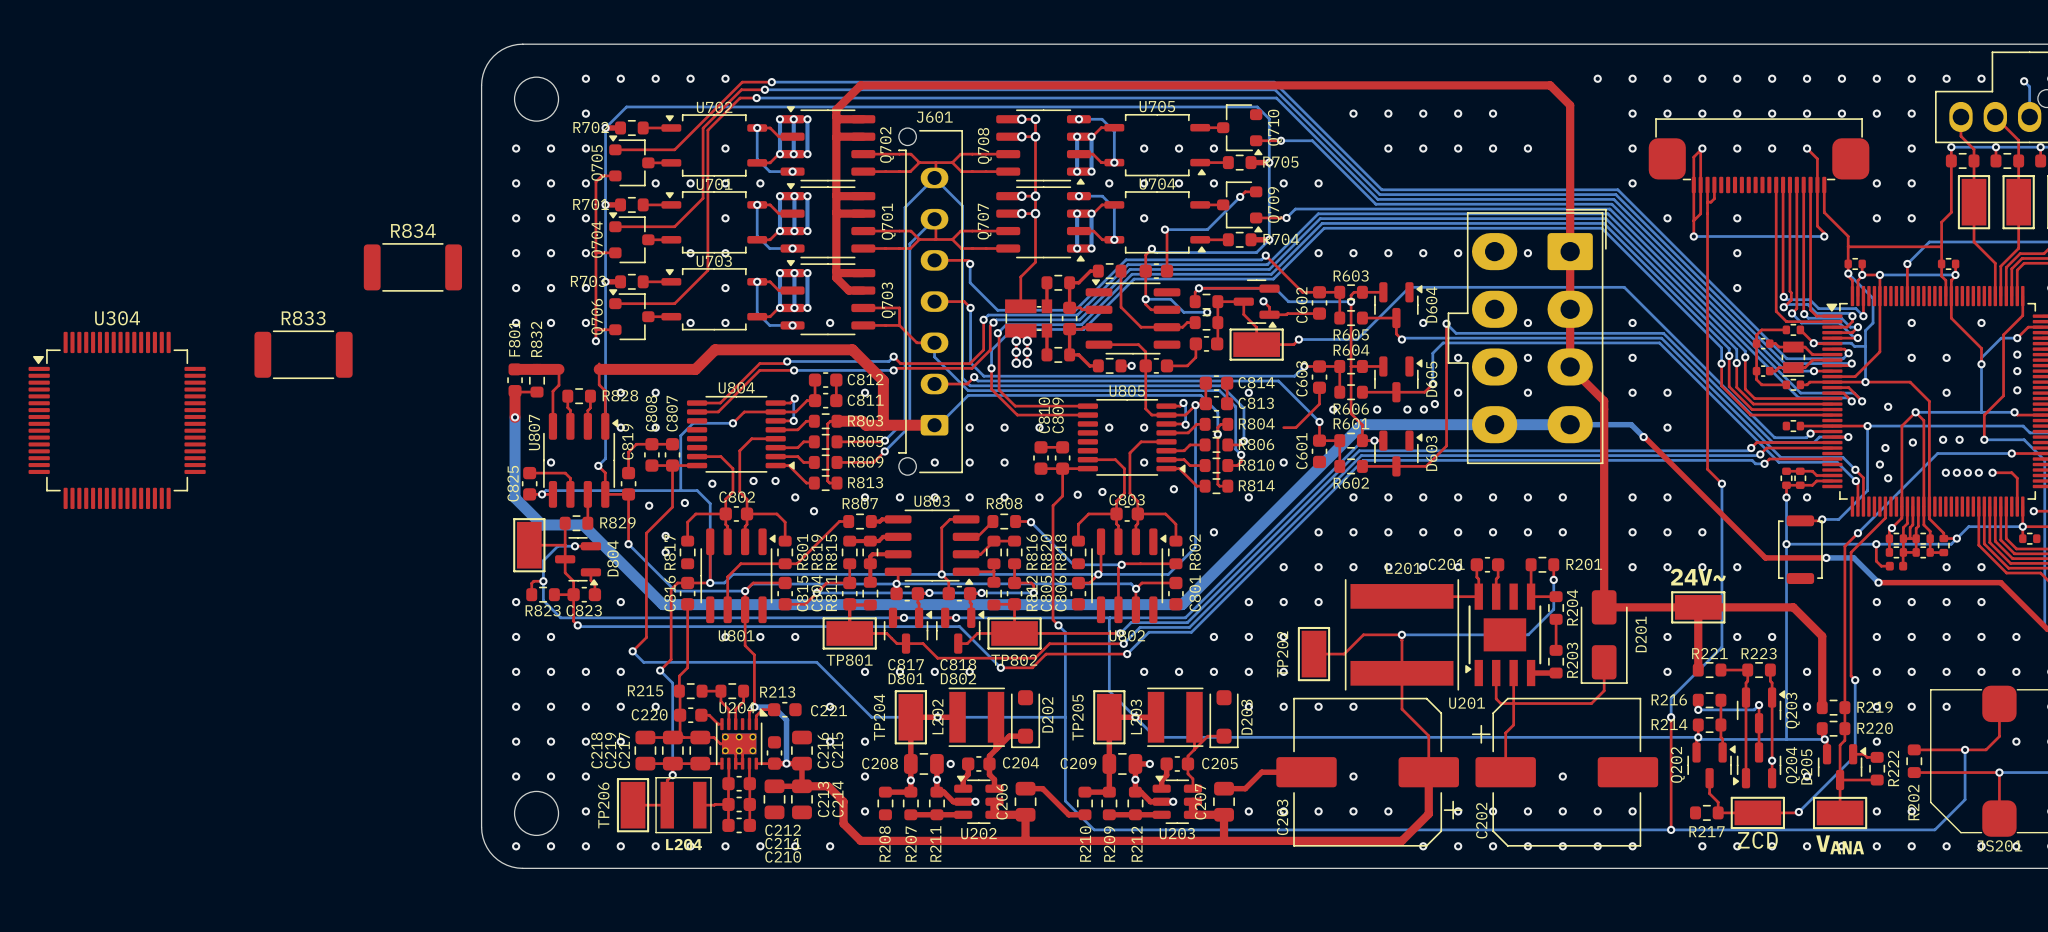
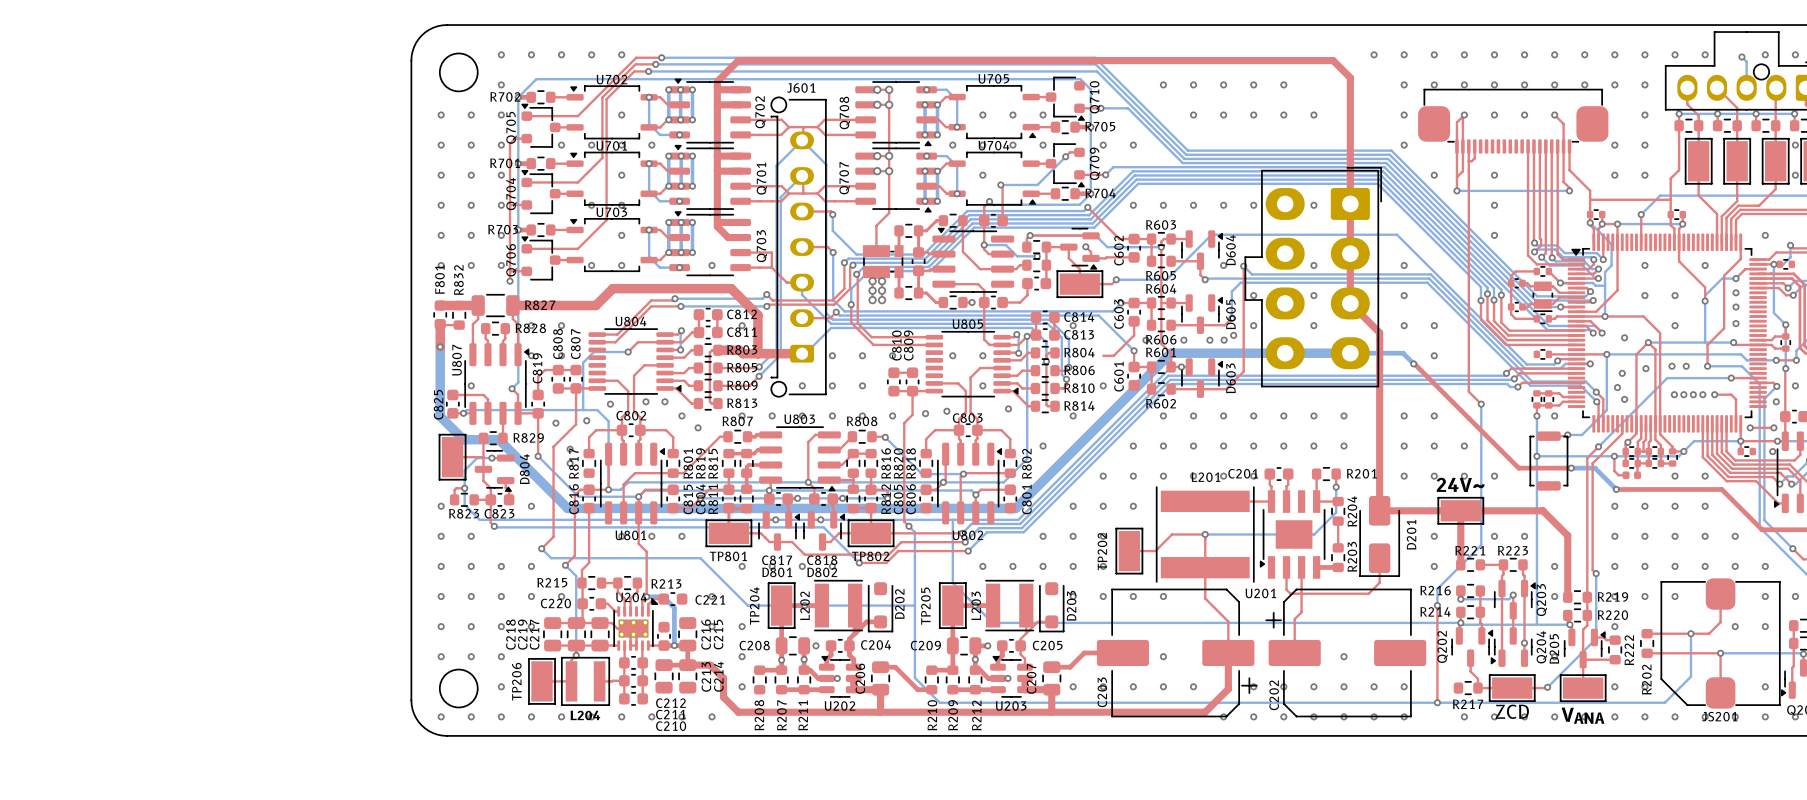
R834: (412, 267) -> none
R833: (303, 354) -> none
R827: none -> (495, 305)
U304: (117, 420) -> none

